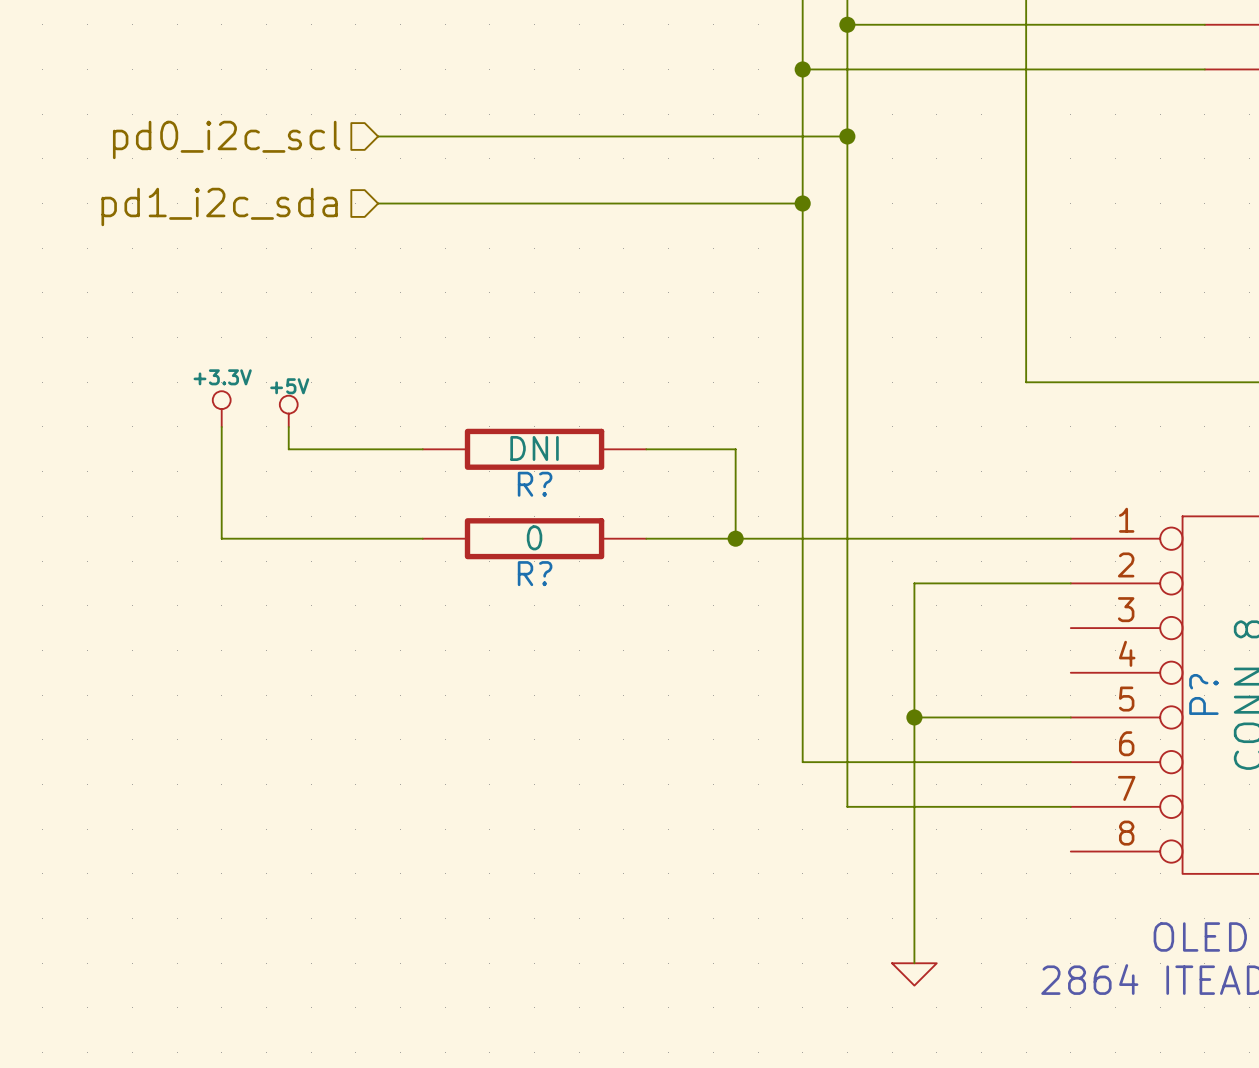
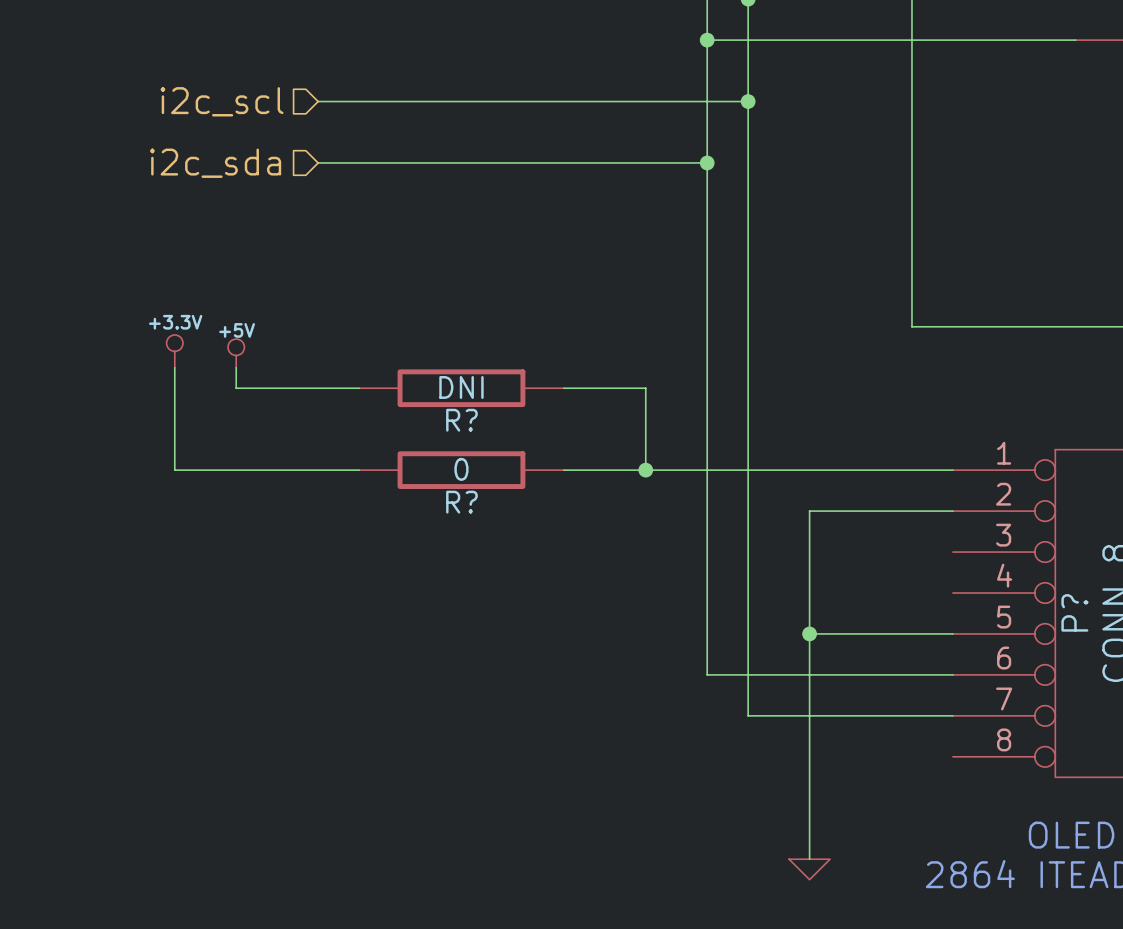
hierarchical label: pd0_i2c_scl (226, 139) -> i2c_scl (222, 101)
hierarchical label: pd1_i2c_sda (219, 206) -> i2c_sda (215, 163)

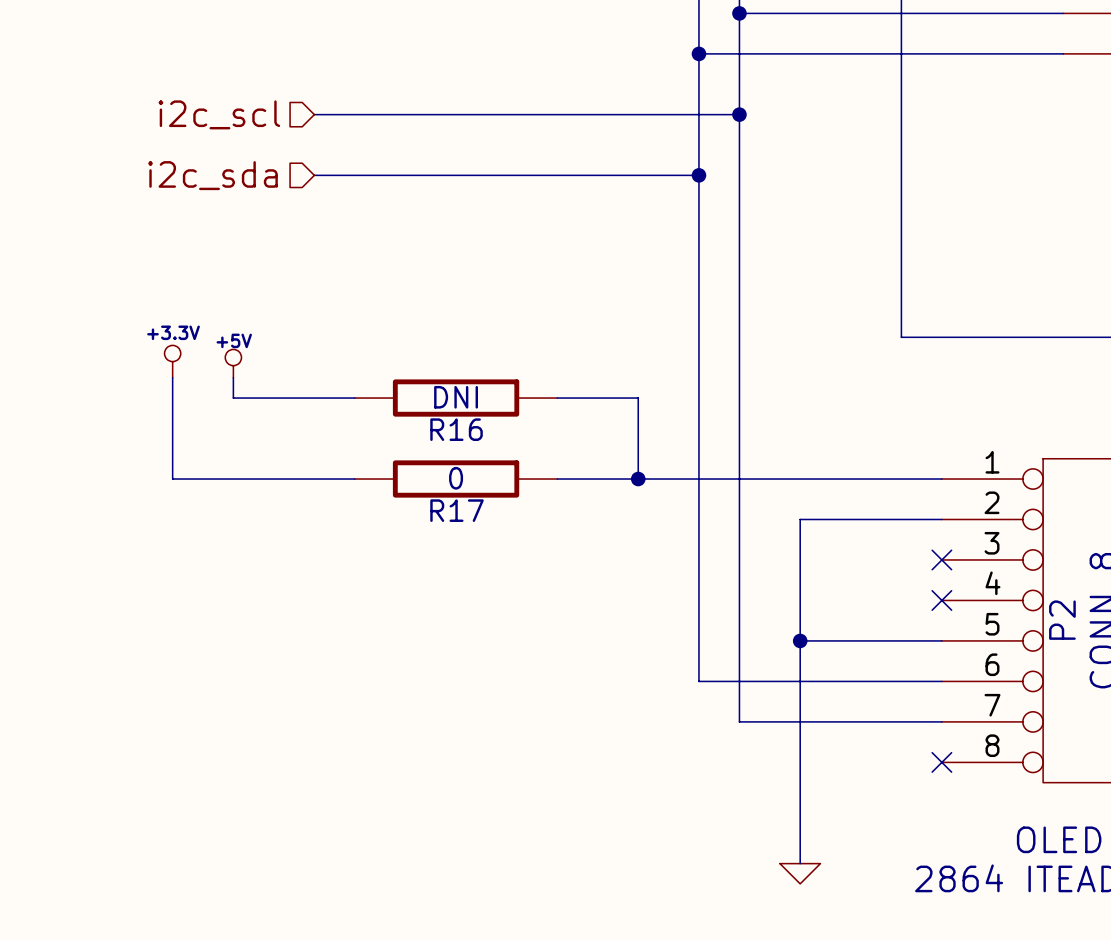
R? name: R? (461, 420) -> R16 (456, 429)
R? name: R? (461, 502) -> R17 (457, 510)
no-connect mark: none -> (941, 559)
no-connect mark: none -> (941, 600)
P? name: P? (1074, 612) -> P2 (1062, 620)
no-connect mark: none -> (941, 762)

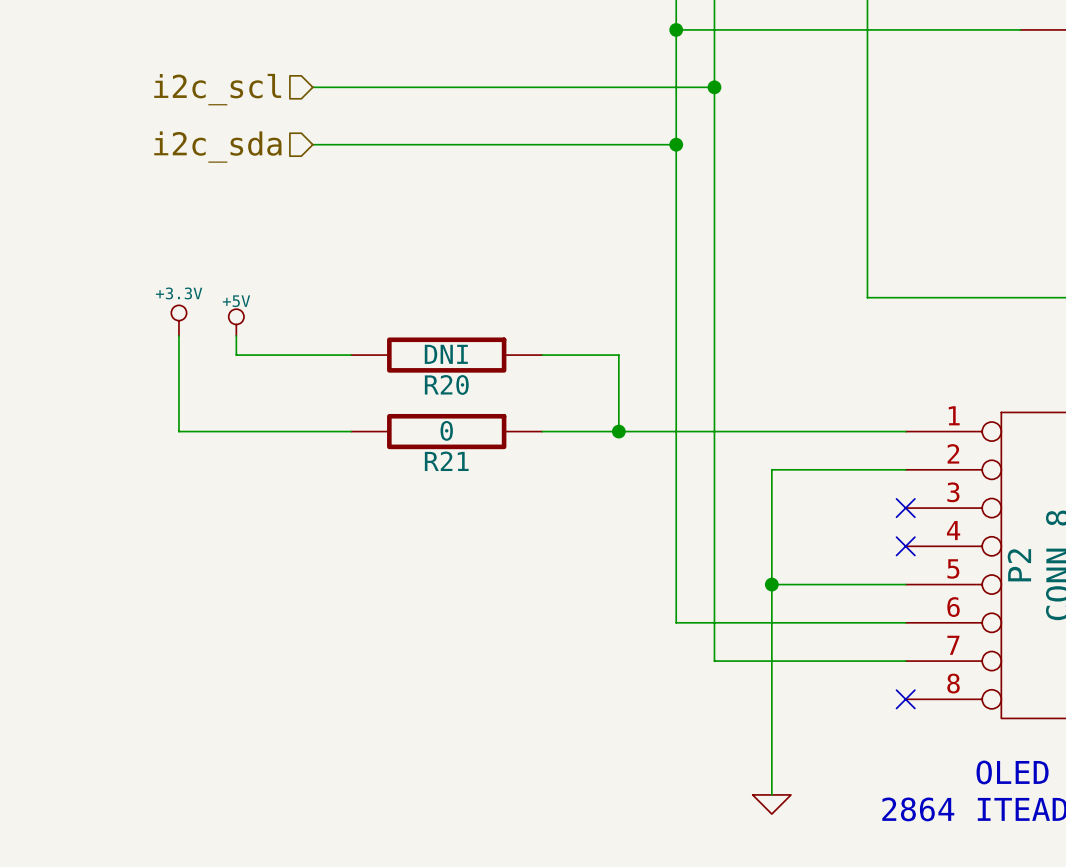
R16 name: R16 (456, 429) -> R20 (446, 384)
R17 name: R17 (457, 510) -> R21 (446, 461)

